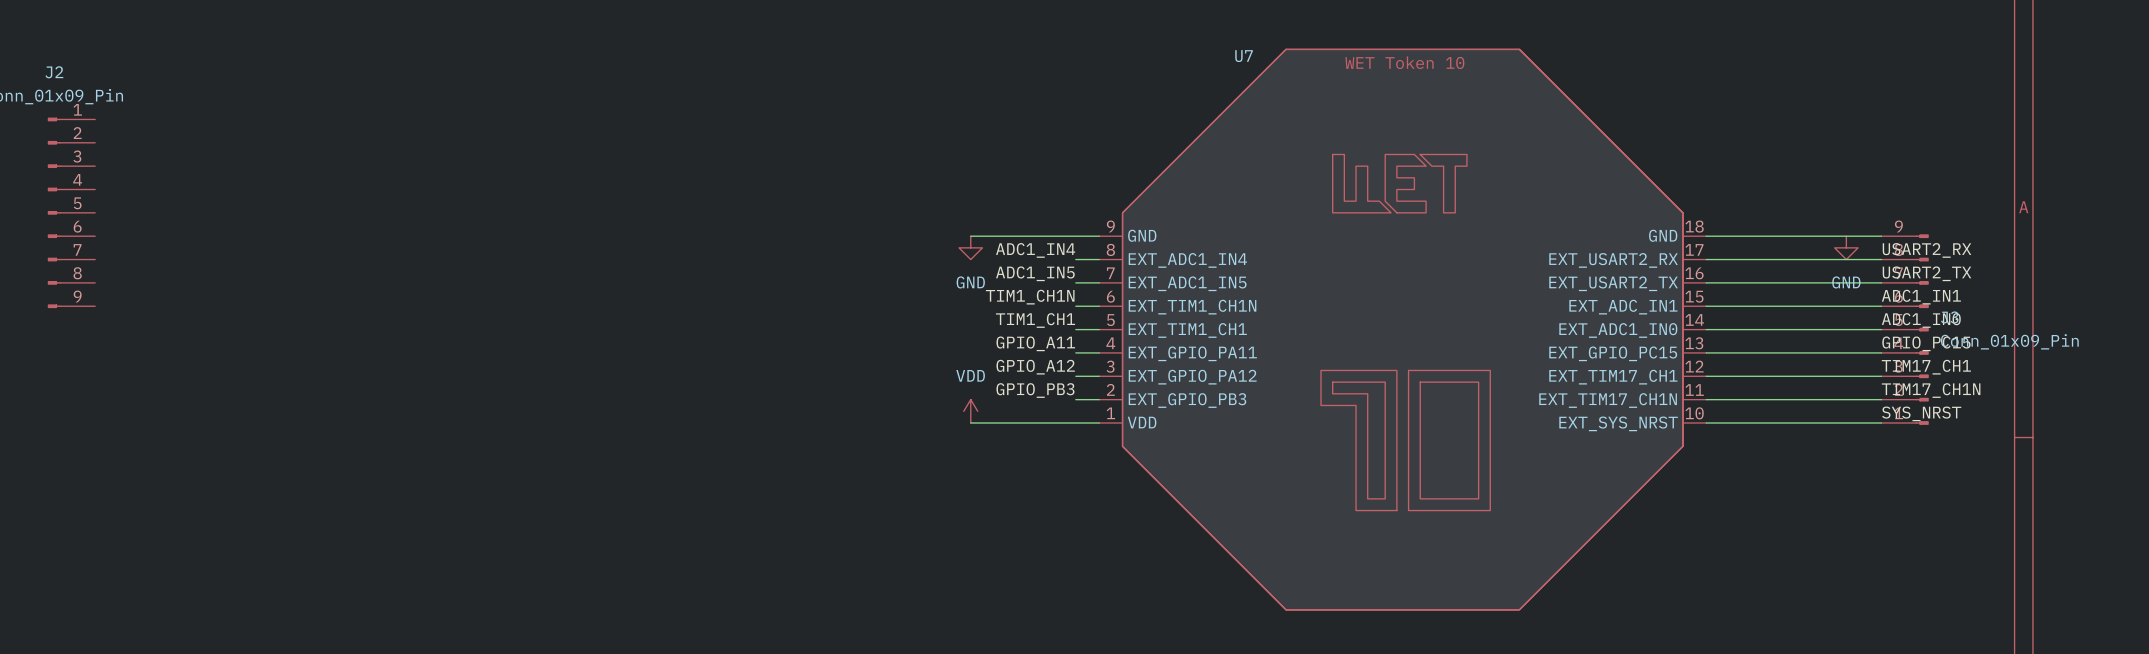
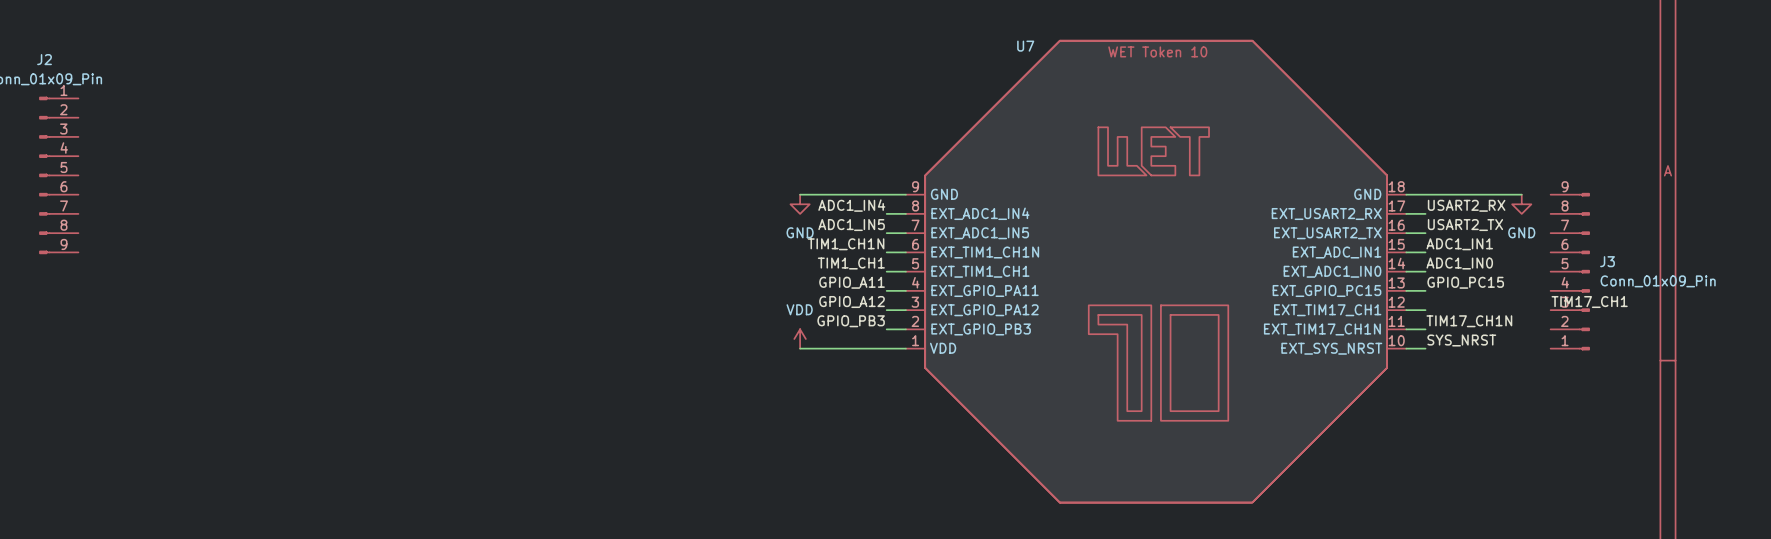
wire: (1846, 236) (1881, 236) -> none
label position: USART2_RX (1927, 250) -> USART2_RX (1466, 205)
wire: (1729, 259) (1881, 259) -> none
label position: USART2_TX (1927, 273) -> USART2_TX (1465, 225)
wire: (1729, 282) (1881, 282) -> none
label position: ADC1_IN1 (1921, 297) -> ADC1_IN1 (1459, 244)
wire: (1729, 306) (1881, 306) -> none
label position: ADC1_IN0 (1921, 320) -> ADC1_IN0 (1459, 263)
wire: (1729, 329) (1881, 329) -> none
label position: GPIO_PC15 (1926, 343) -> GPIO_PC15 (1465, 282)
wire: (1729, 352) (1881, 352) -> none
wire: (1729, 376) (1881, 376) -> none
label position: TIM17_CH1N (1931, 390) -> TIM17_CH1N (1469, 321)
wire: (1729, 399) (1881, 399) -> none
label position: SYS_NRST (1921, 413) -> SYS_NRST (1461, 340)
wire: (1729, 422) (1881, 422) -> none

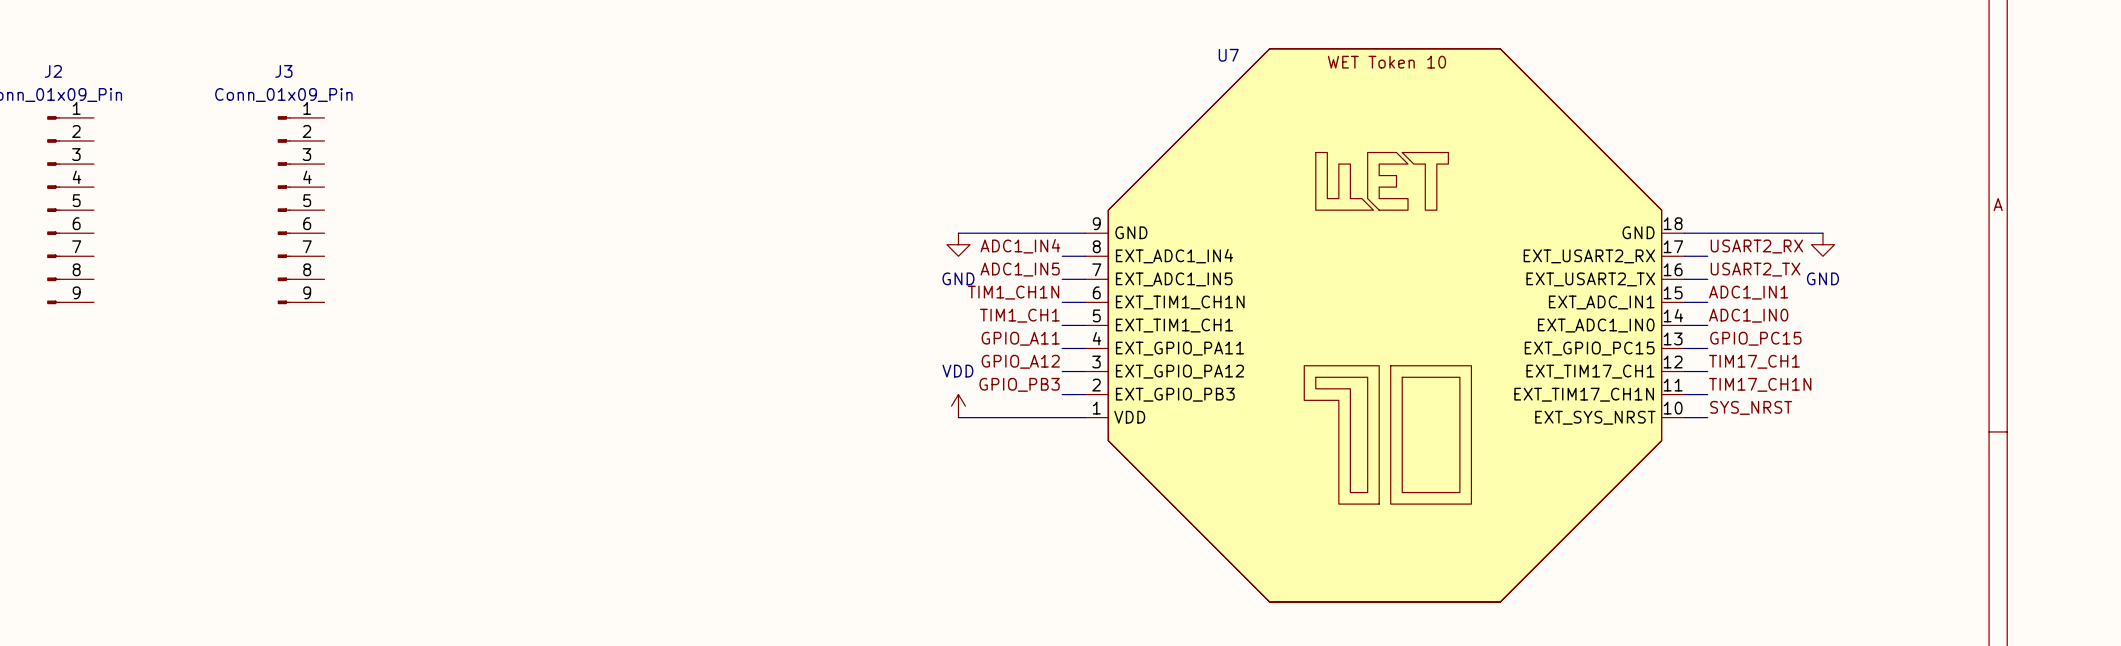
J3 name position: J3 (1607, 261) -> J3 (283, 71)
J3 position: (1570, 271) -> (301, 210)
J3 rotation: 0° (1584, 271) -> 180° (284, 210)
J3 value position: Conn_01x09_Pin (1658, 281) -> Conn_01x09_Pin (283, 95)
label position: TIM17_CH1 (1589, 302) -> TIM17_CH1 (1754, 361)

